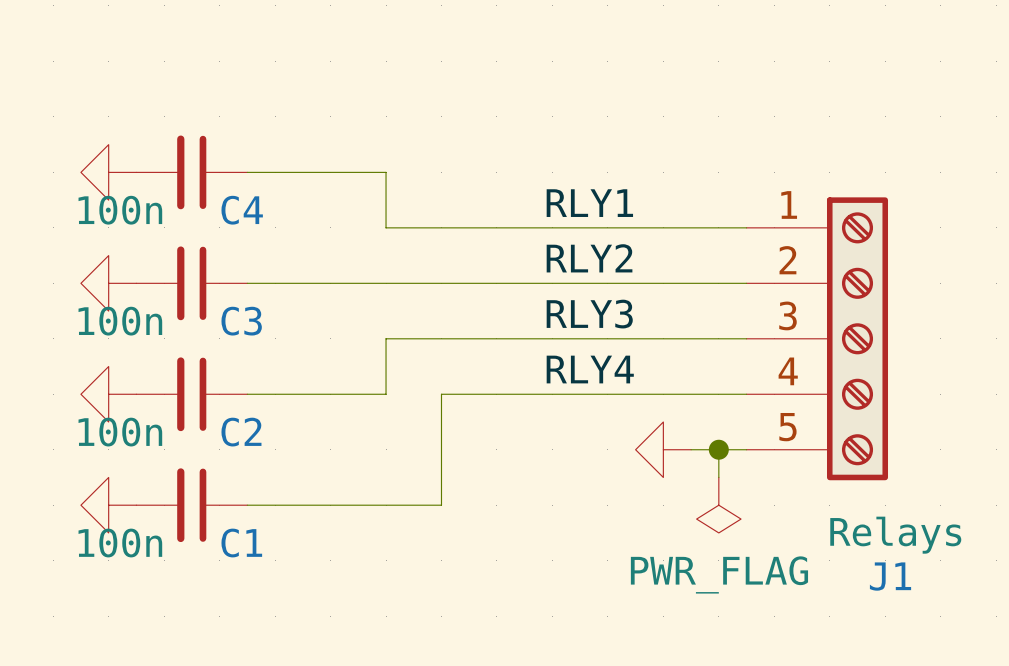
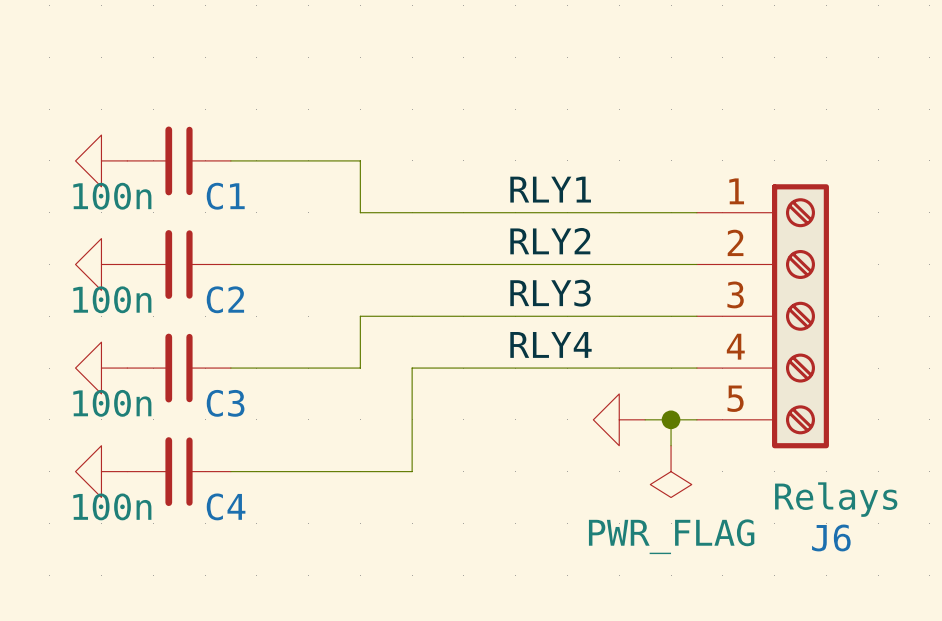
C4 name: C4 (242, 210) -> C1 (225, 196)
C3 name: C3 (241, 321) -> C2 (225, 299)
C2 name: C2 (241, 432) -> C3 (225, 403)
C1 name: C1 (241, 543) -> C4 (226, 506)
J1 name: J1 (890, 576) -> J6 (831, 537)

